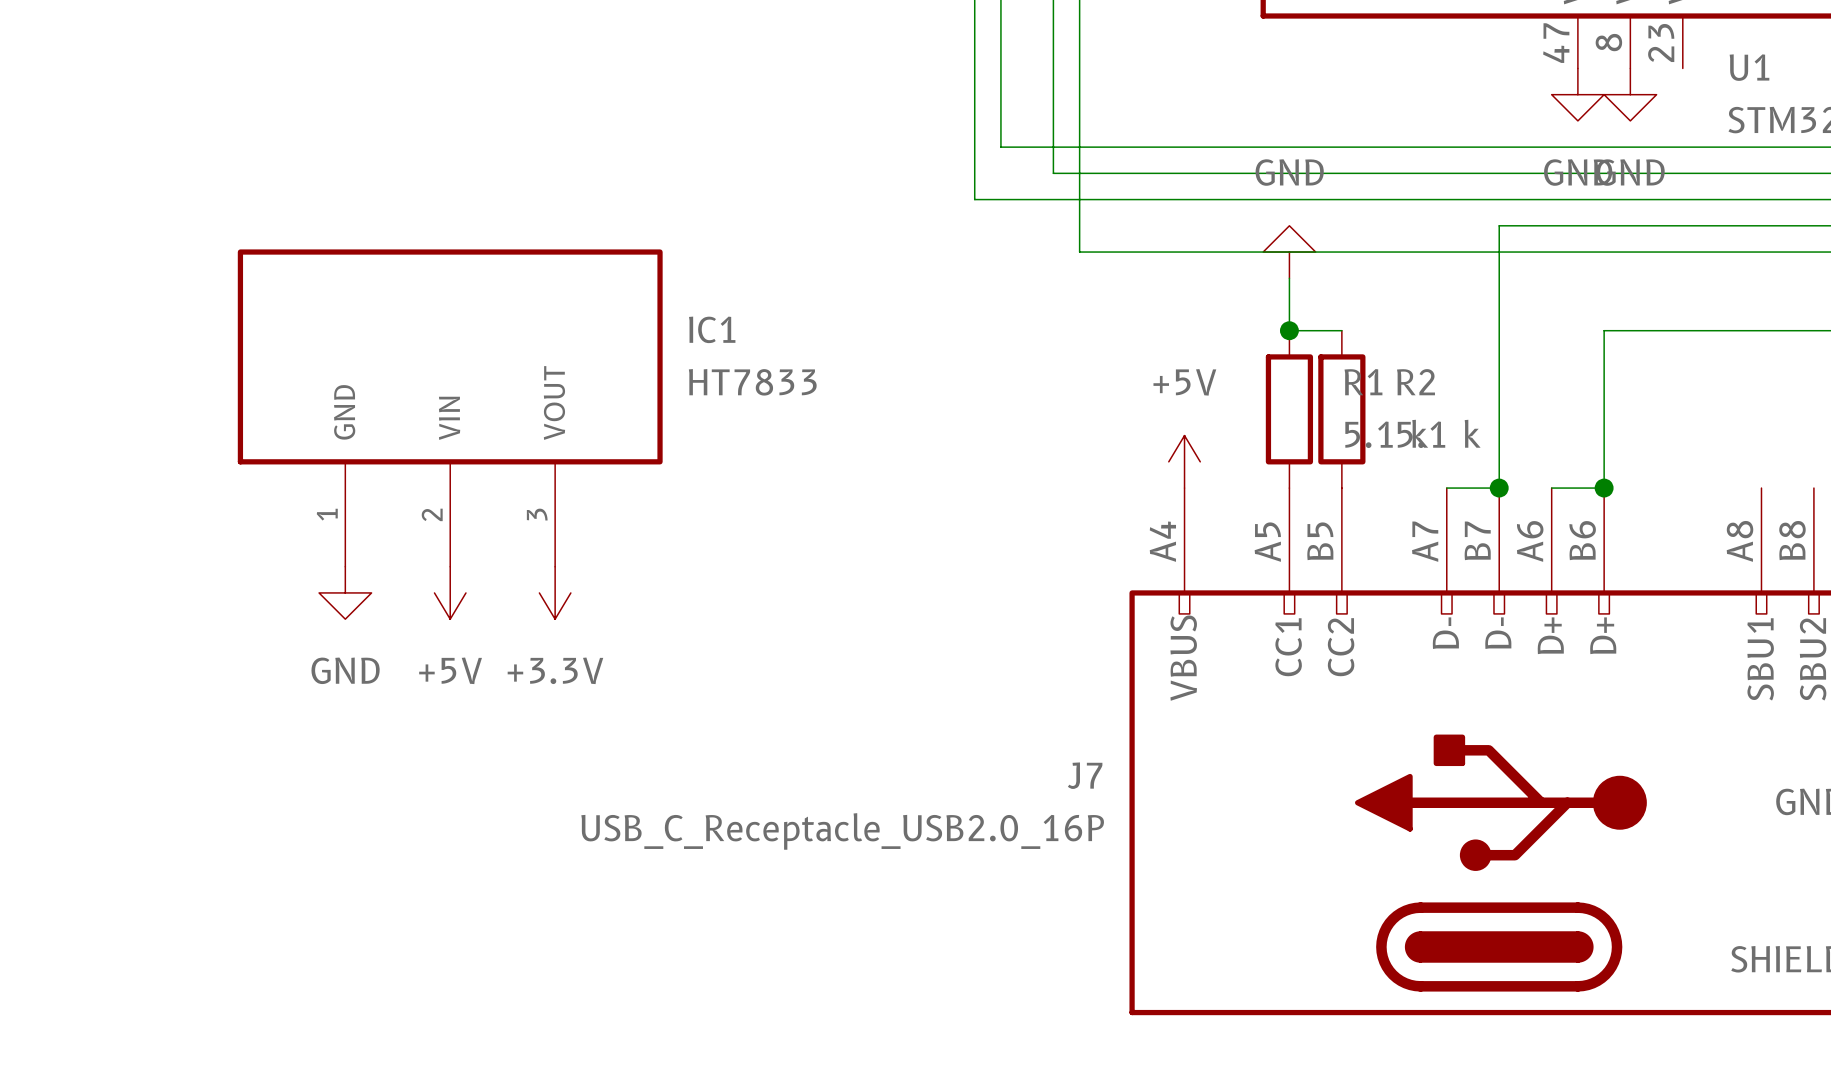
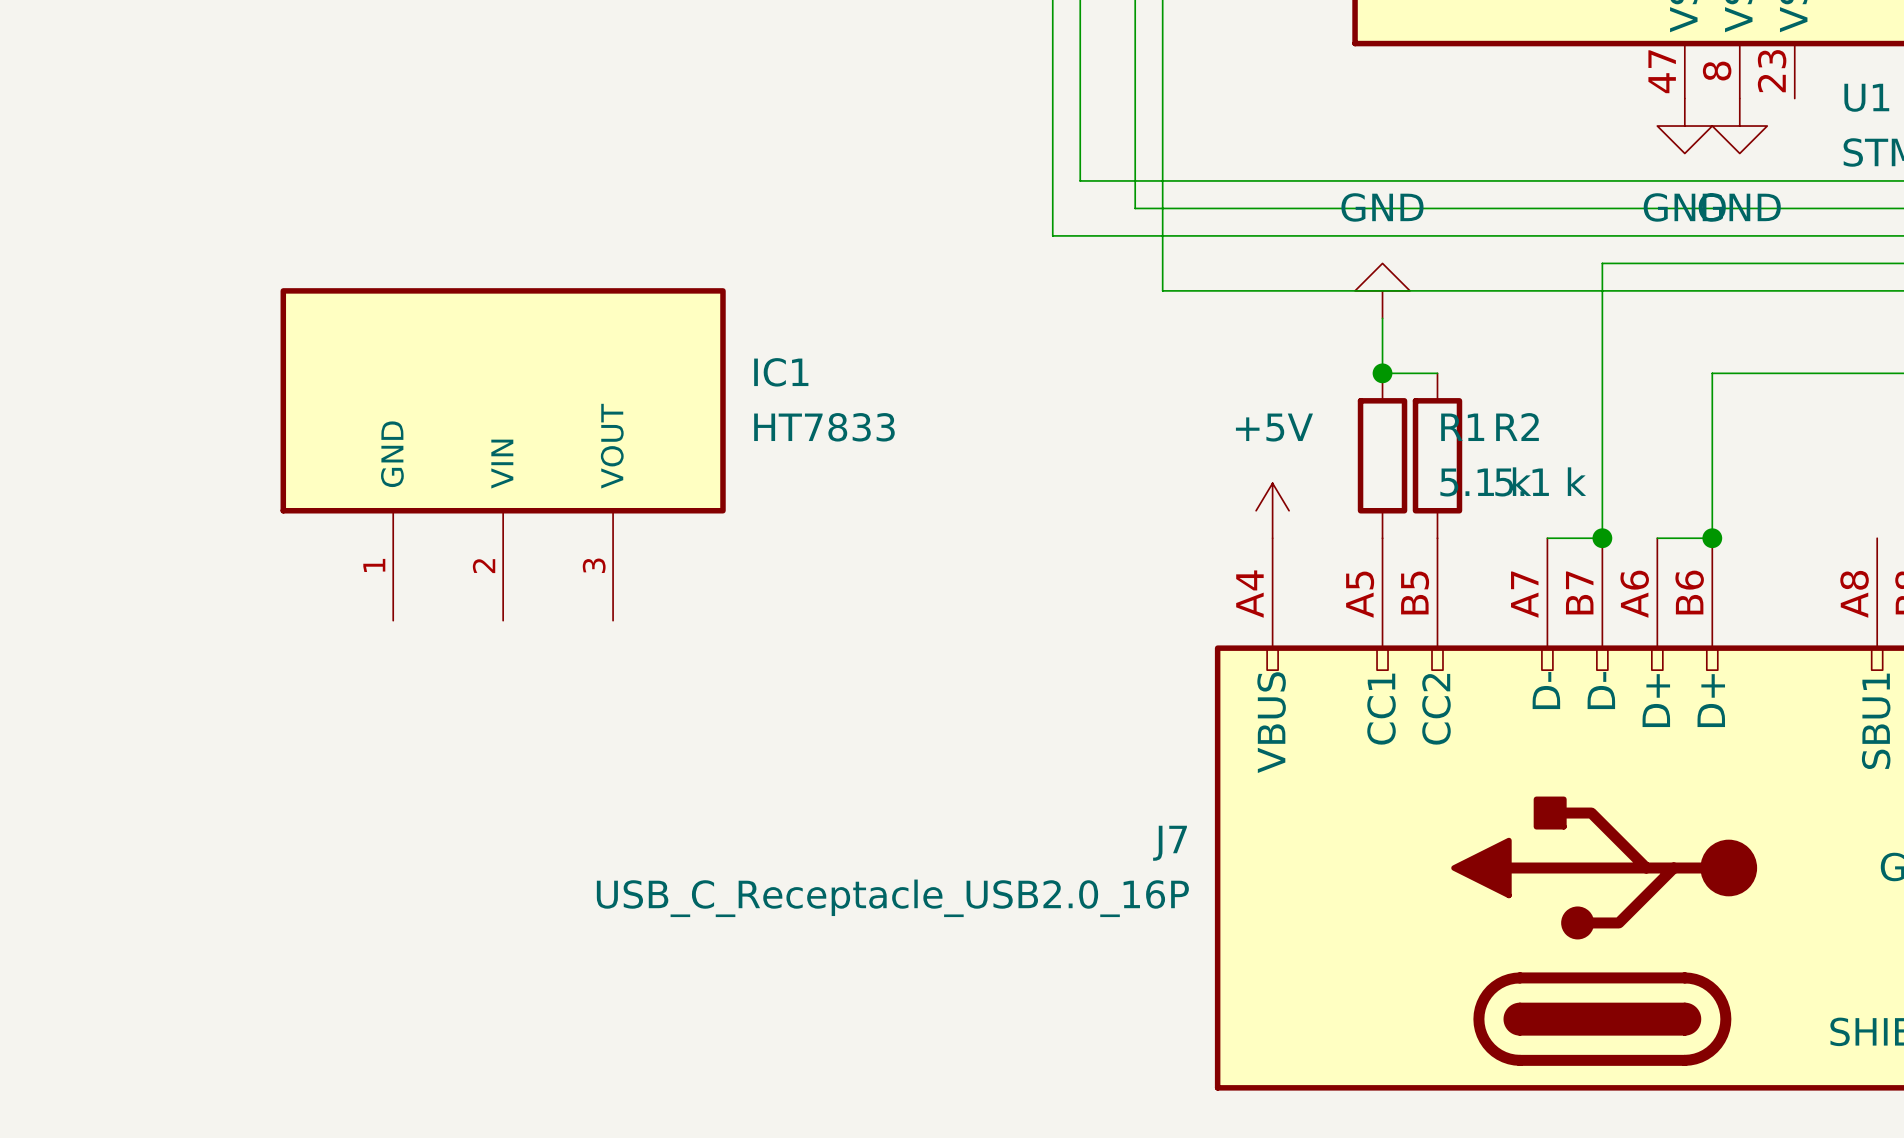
power symbol: GND (345, 592) -> none
power symbol: +5V (450, 592) -> none
power symbol: +3.3V (555, 592) -> none

